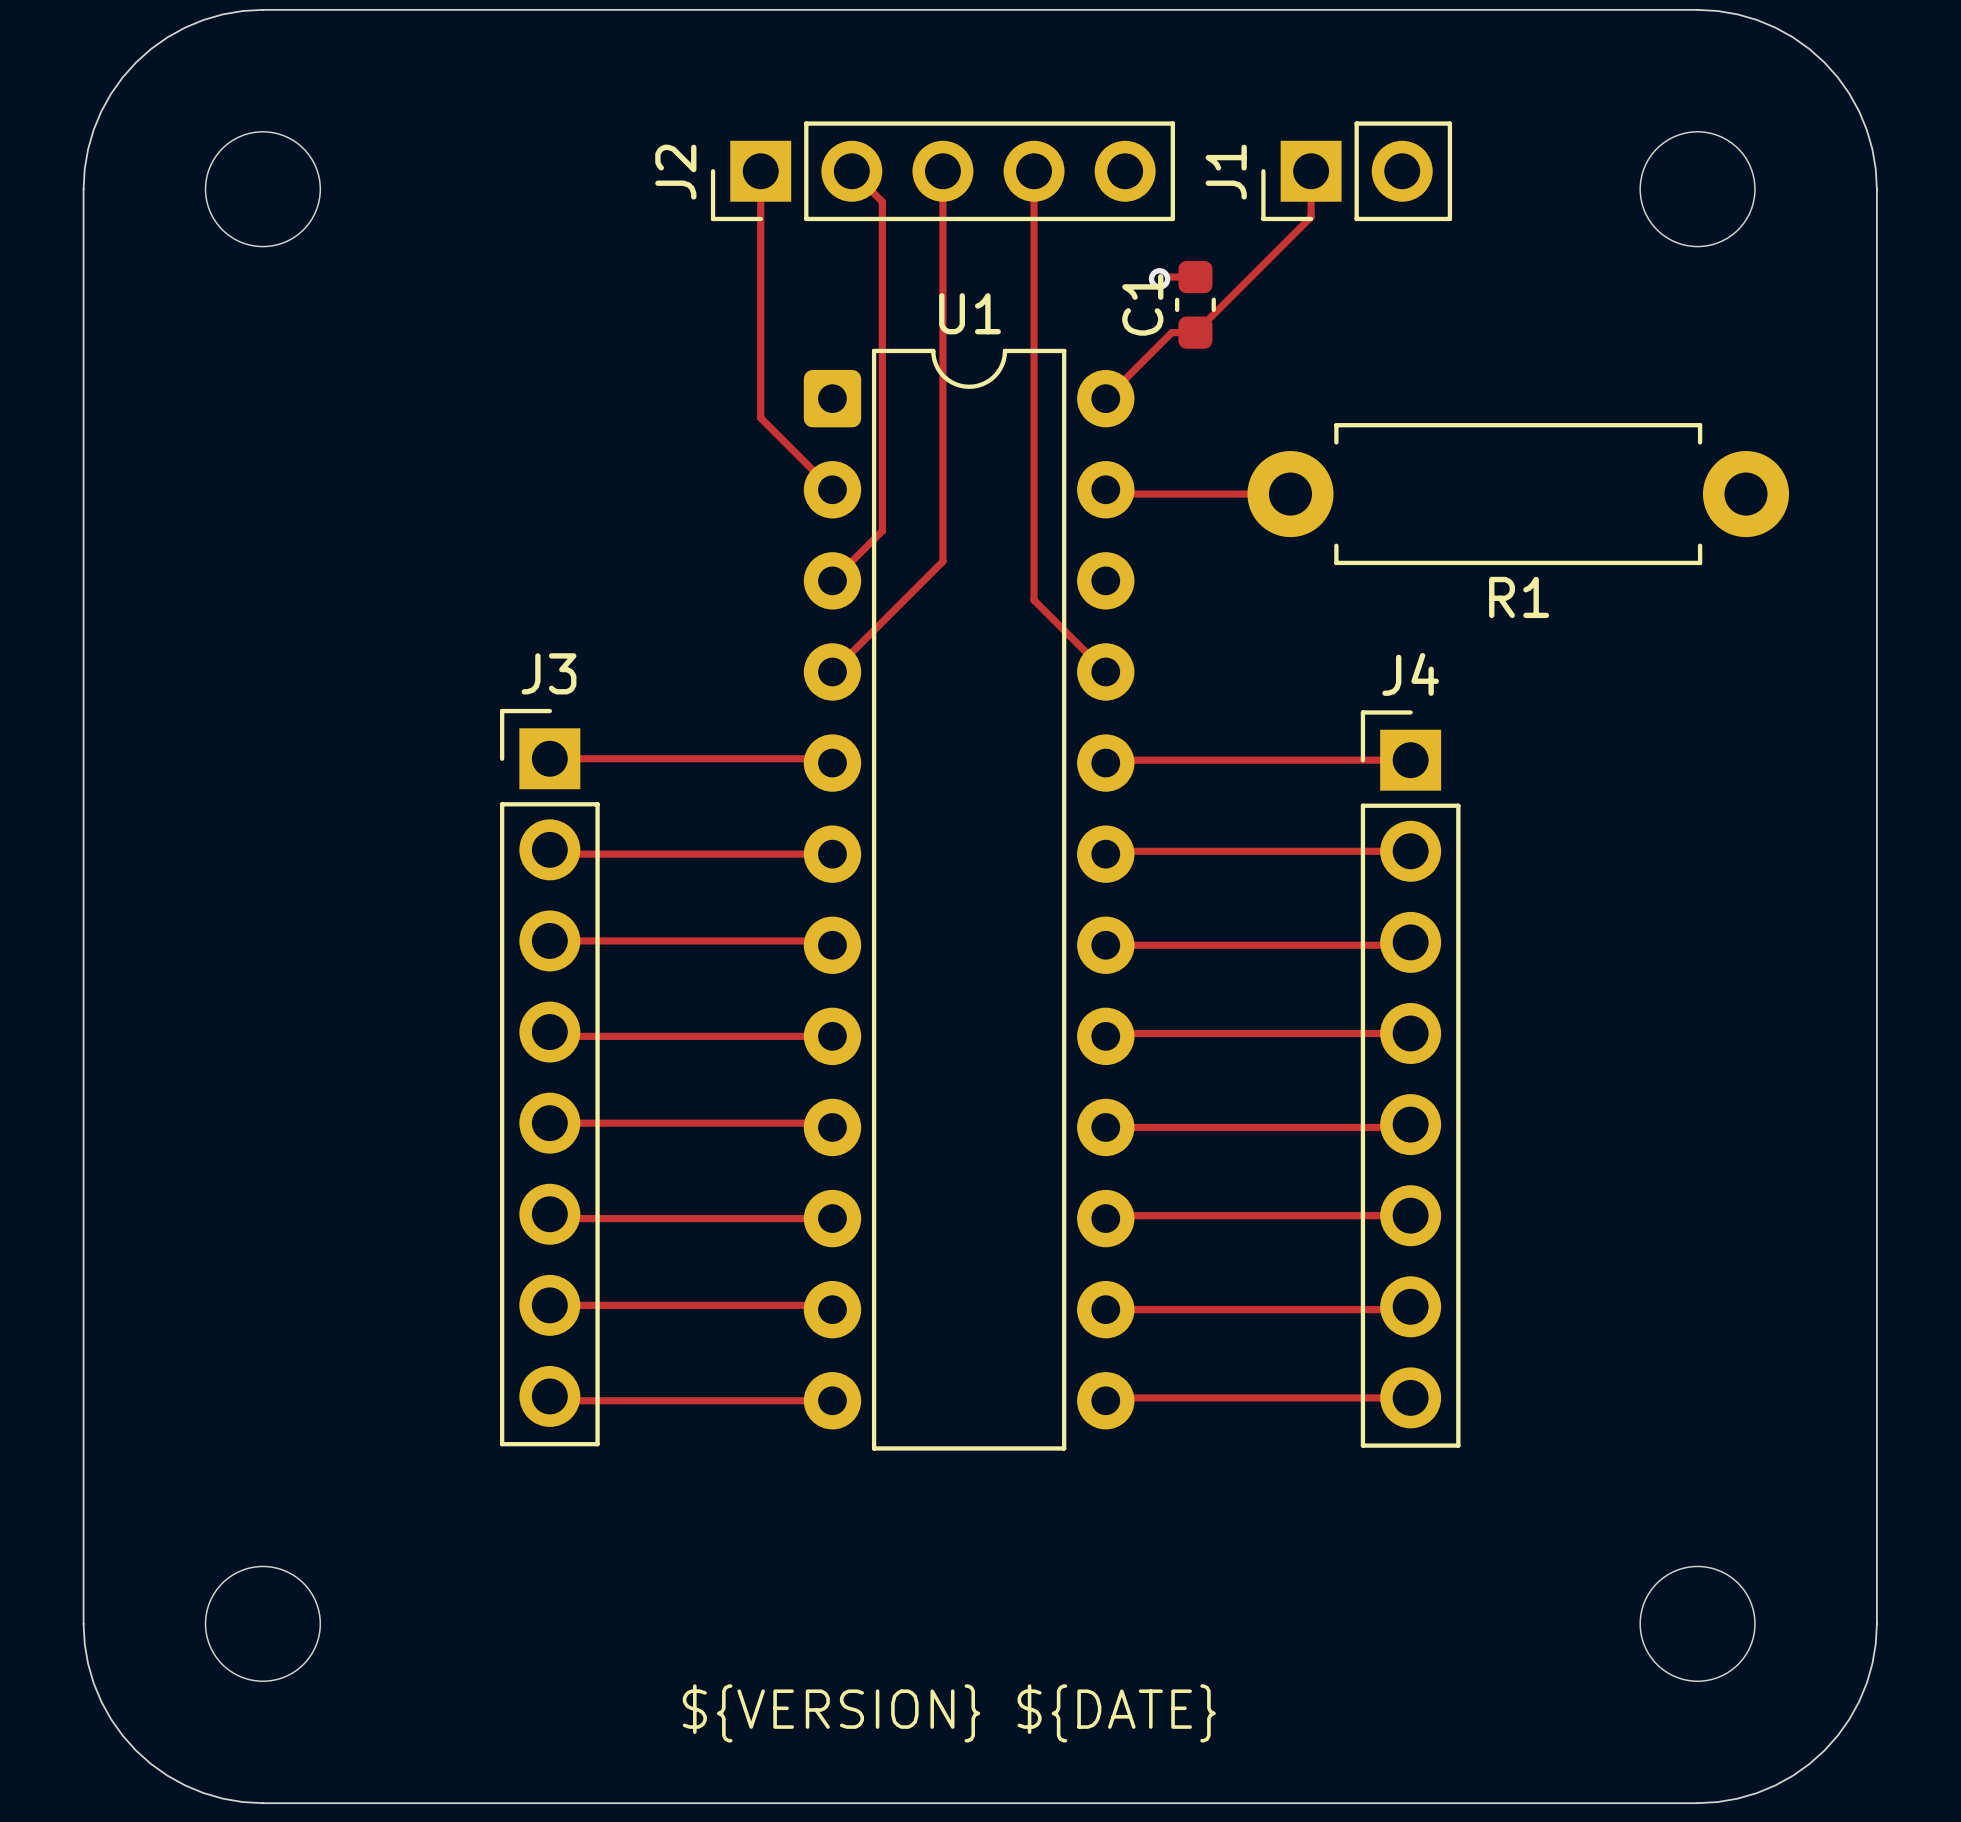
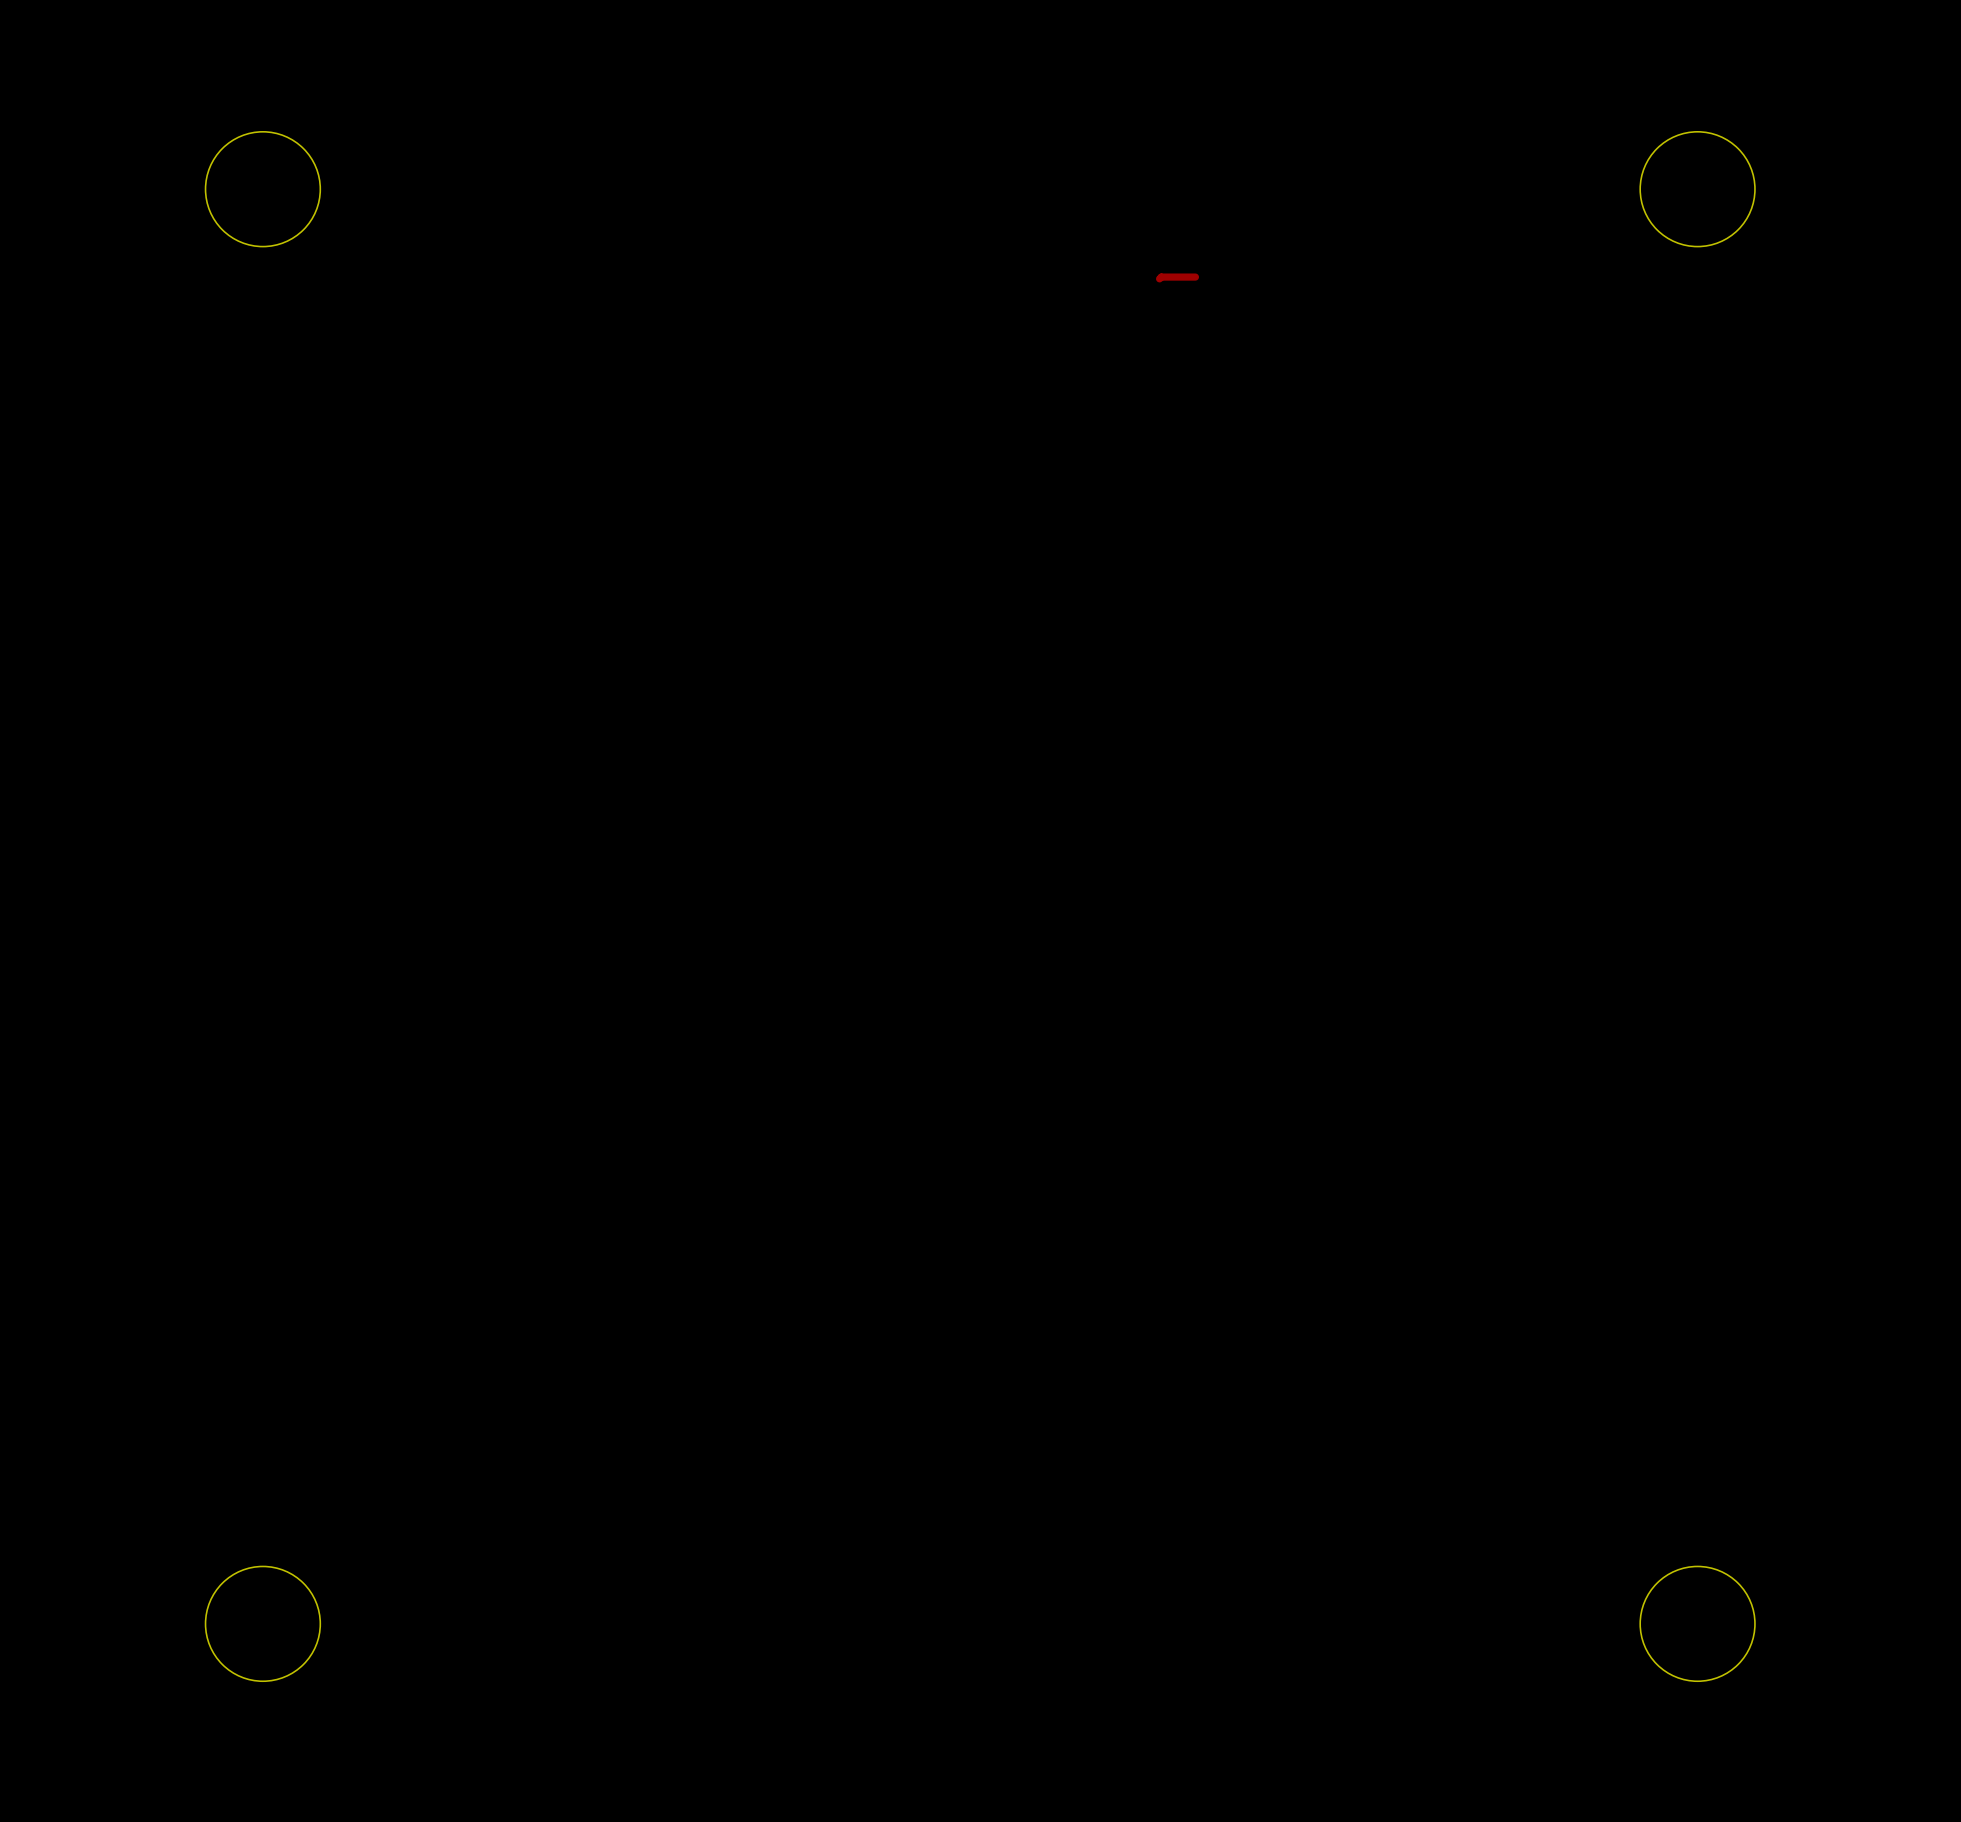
board edge: (262, 9) (1697, 9) (1737, 14) (1775, 27) (1809, 48) (1837, 77) (1859, 111) (1866, 129) (1875, 169) (1876, 189) (1876, 1623) (1872, 1663) (1859, 1701) (1837, 1735) (1809, 1764) (1775, 1785) (1756, 1793) (1737, 1798) (1697, 1803) (262, 1803) (223, 1798) (185, 1785) (151, 1764) (122, 1735) (101, 1701) (93, 1683) (84, 1643) (83, 1623) (84, 169) (88, 149) (101, 111) (122, 77) (136, 62) (151, 48) (185, 27) (223, 14) (262, 9) -> none
track: (760, 171) (760, 418) (832, 489) -> none
track: (851, 171) (882, 201) (882, 531) (832, 580) -> none
track: (942, 171) (942, 561) (832, 671) -> none
J2: (942, 171) -> none
track: (1034, 171) (1034, 600) (1105, 671) -> none
track: (1311, 171) (1311, 216) (1195, 332) (1171, 332) (1105, 398) -> none
J1: (1356, 171) -> none
via: (1159, 278) -> none
C1: (1195, 304) -> none
track: (1105, 489) (1110, 494) (1290, 494) -> none
R1: (1518, 494) -> none
track: (549, 758) (828, 758) (832, 763) -> none
track: (1410, 760) (1126, 760) (1123, 763) (1105, 763) -> none
track: (549, 849) (554, 854) (832, 854) -> none
track: (1410, 851) (1108, 851) (1105, 854) -> none
U1: (969, 899) -> none
track: (549, 940) (828, 940) (832, 945) -> none
track: (1410, 942) (1407, 945) (1105, 945) -> none
track: (549, 1032) (554, 1036) (832, 1036) -> none
track: (1410, 1033) (1108, 1033) (1105, 1036) -> none
J3: (549, 1077) -> none
J4: (1410, 1079) -> none
track: (549, 1123) (828, 1123) (832, 1127) -> none
track: (1410, 1124) (1407, 1127) (1105, 1127) -> none
track: (549, 1214) (554, 1218) (832, 1218) -> none
track: (1410, 1215) (1108, 1215) (1105, 1218) -> none
track: (549, 1305) (828, 1305) (832, 1309) -> none
track: (1410, 1306) (1407, 1309) (1105, 1309) -> none
track: (549, 1396) (554, 1400) (832, 1400) -> none
track: (1410, 1397) (1108, 1397) (1105, 1400) -> none
text: ${VERSION} ${DATE} (949, 1713) -> none

